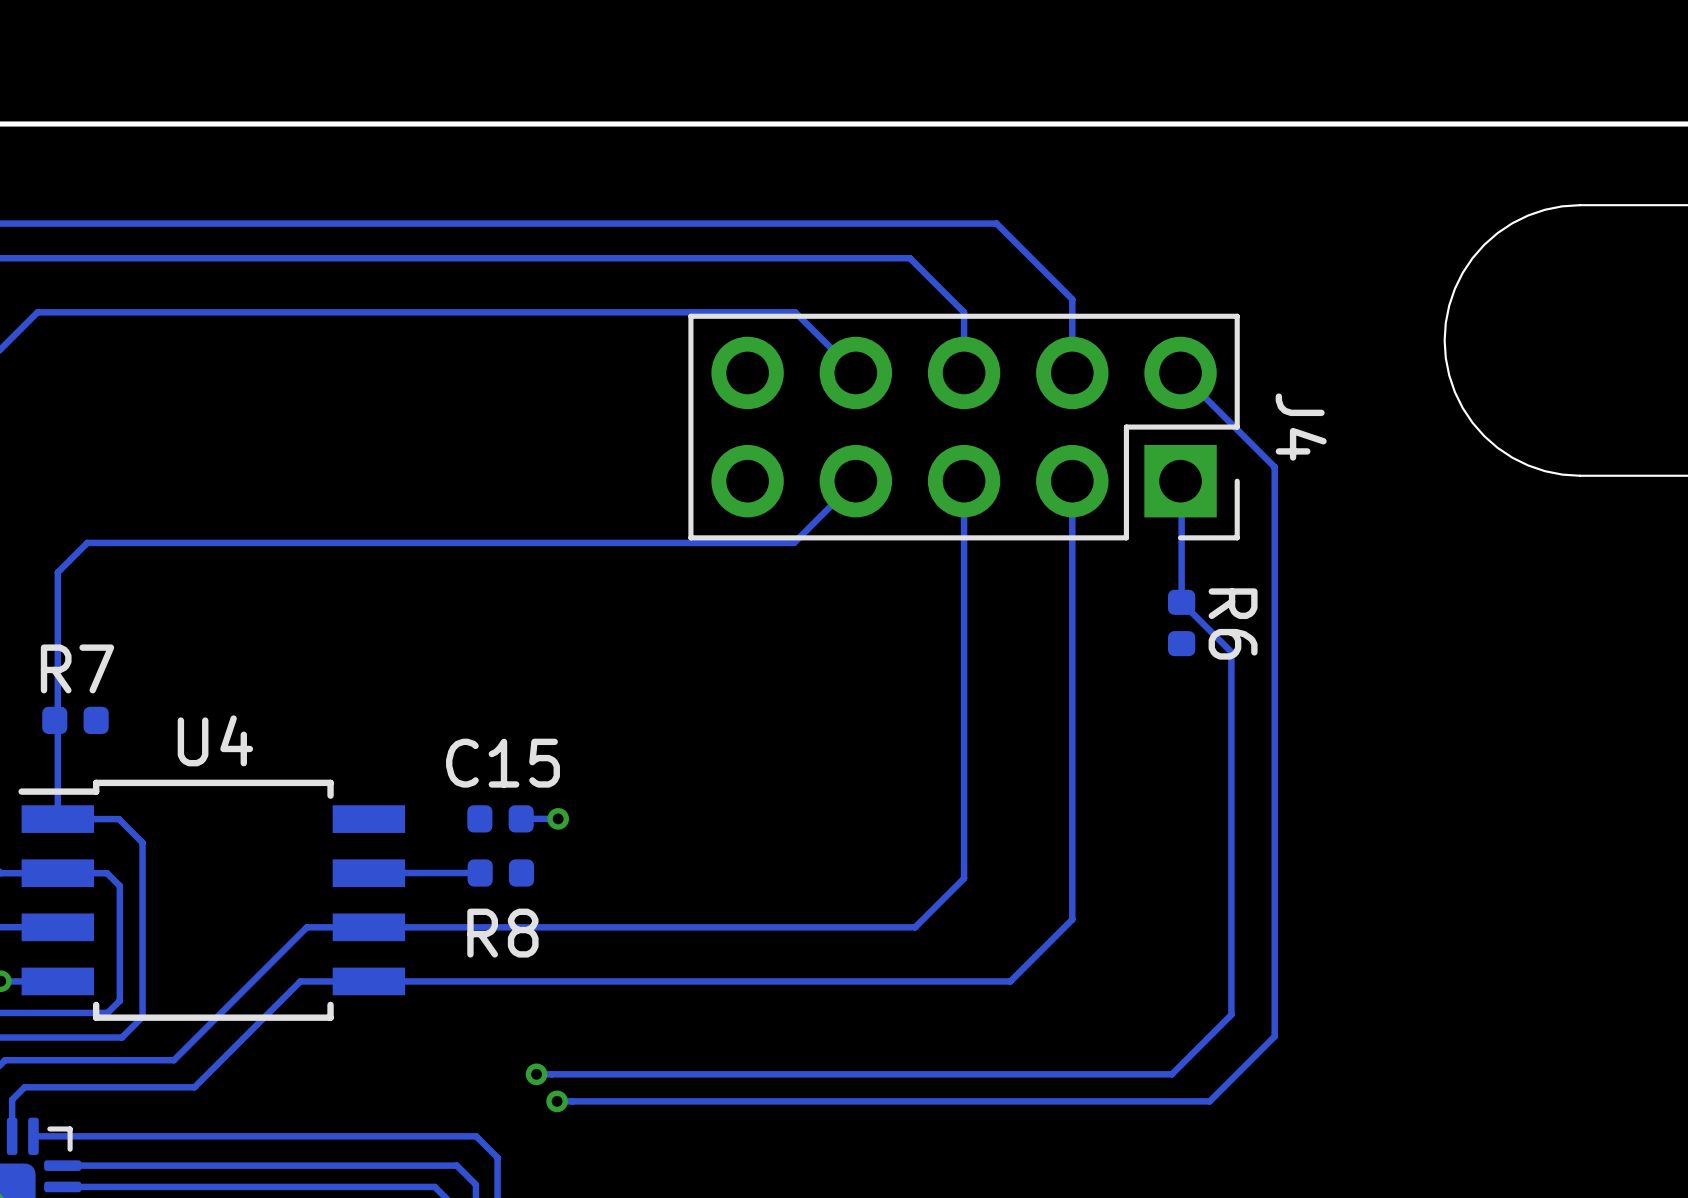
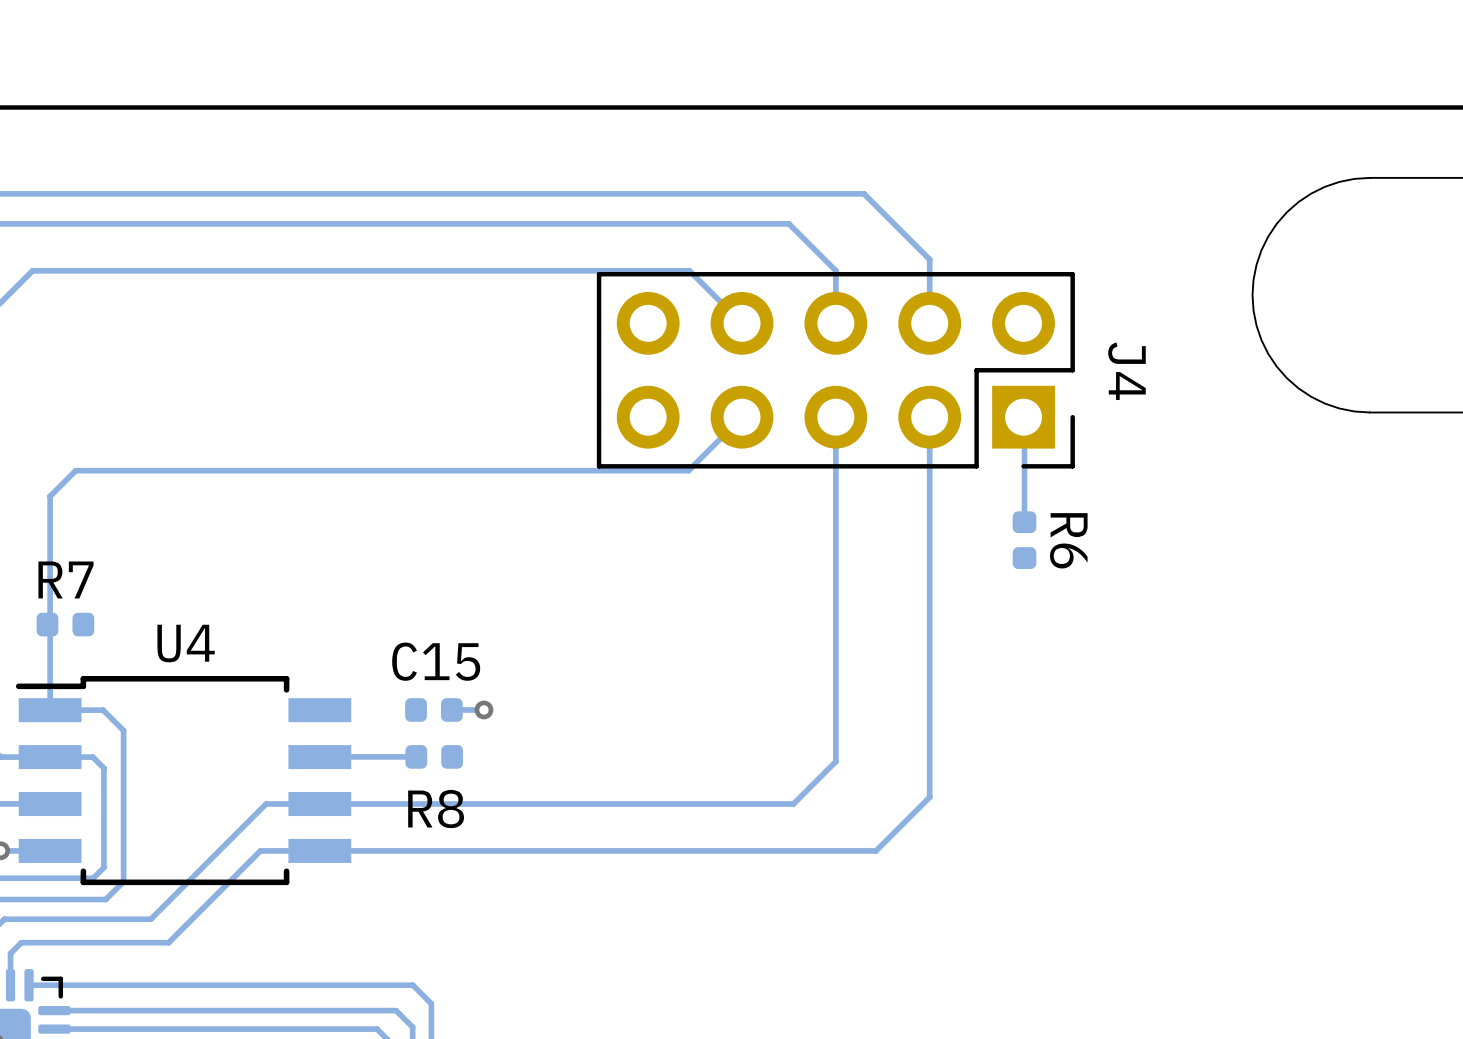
track: (1180, 372) (1274, 467) (1274, 1036) (1209, 1101) (557, 1101) -> none
track: (1181, 602) (1231, 652) (1231, 1014) (1171, 1074) (536, 1074) -> none
via: (536, 1074) -> none
via: (557, 1101) -> none

